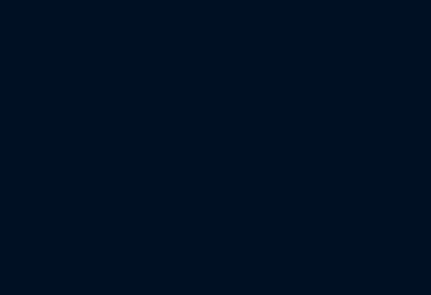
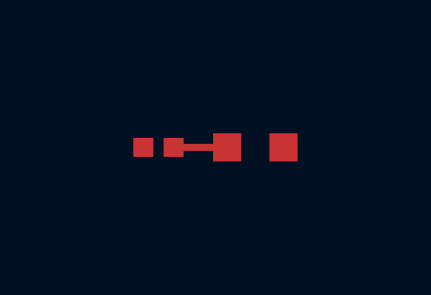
part: none -> (158, 147)
top track: none -> (227, 147) (173, 147)
part: none -> (255, 147)

